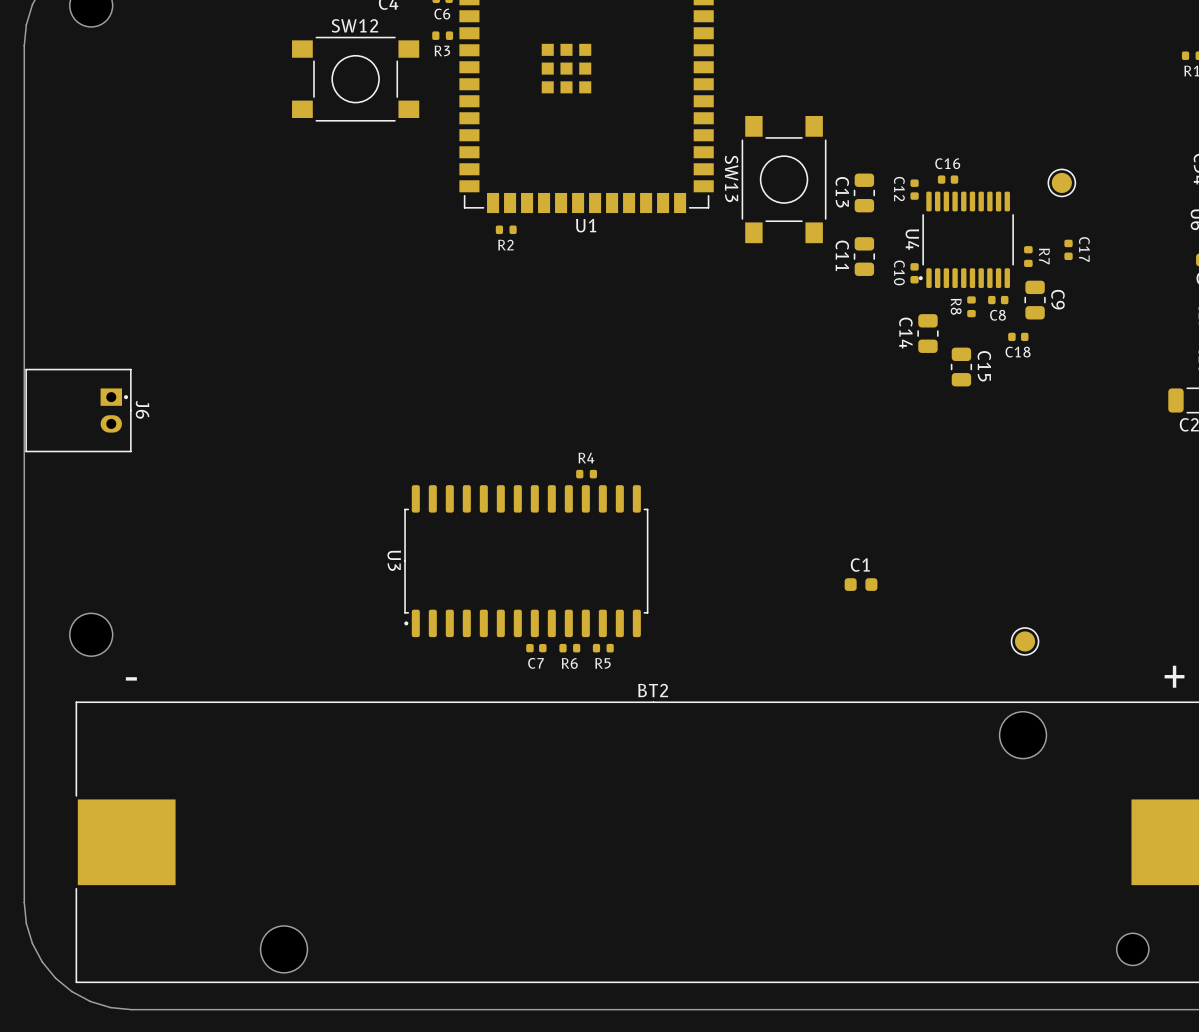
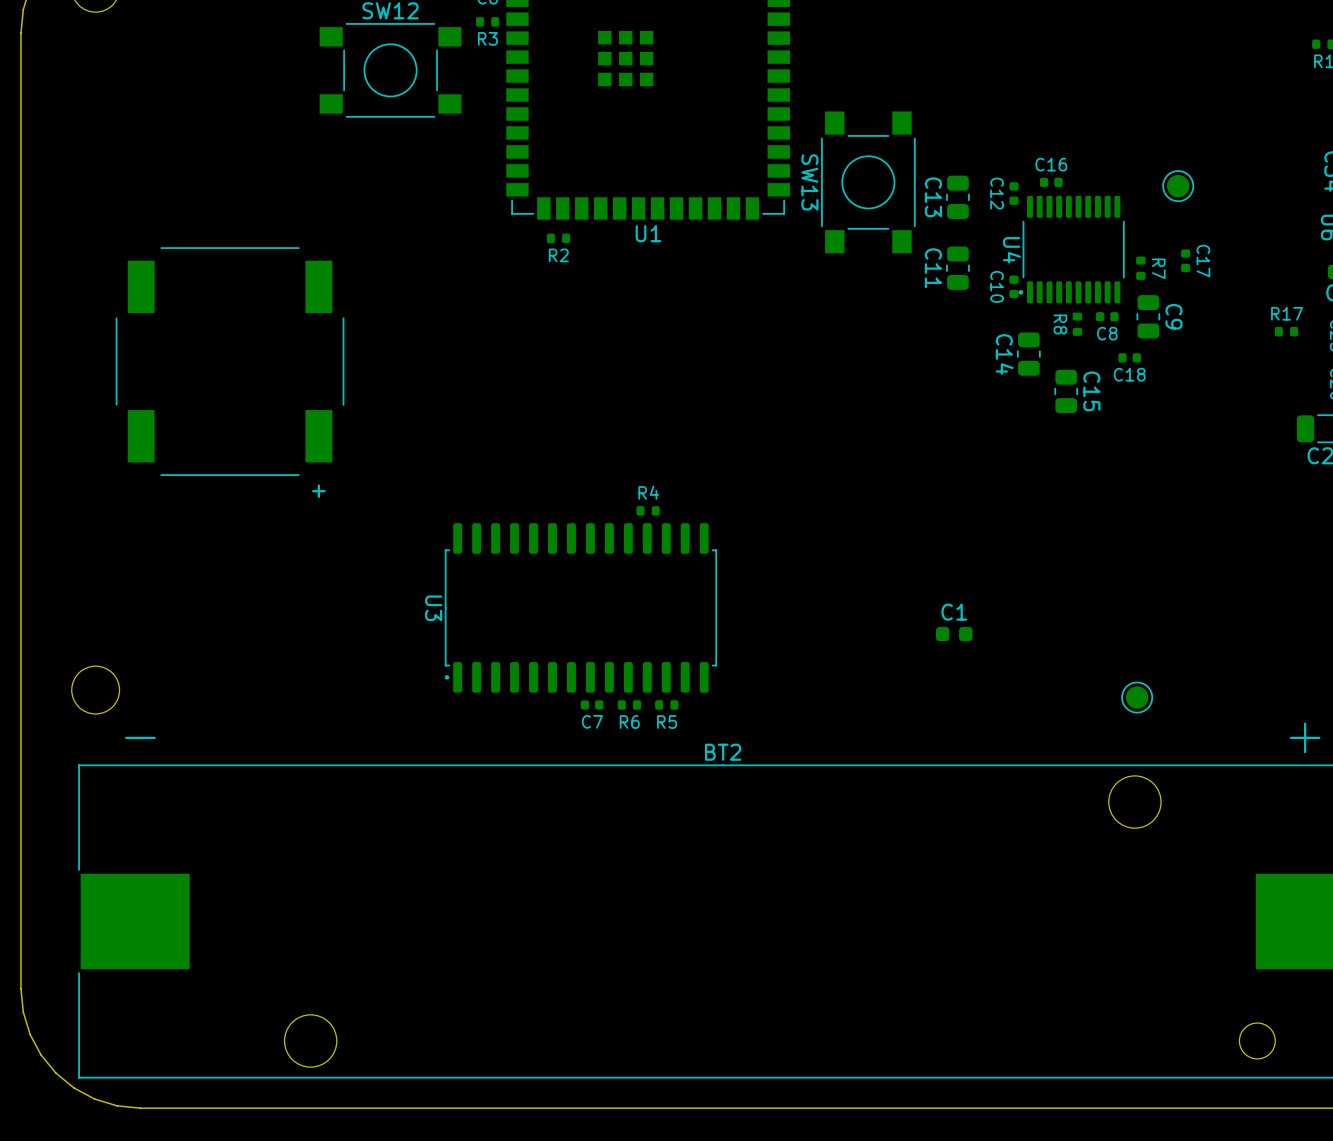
R17: none -> (1286, 331)
part: none -> (230, 361)
J6: (78, 410) -> none

